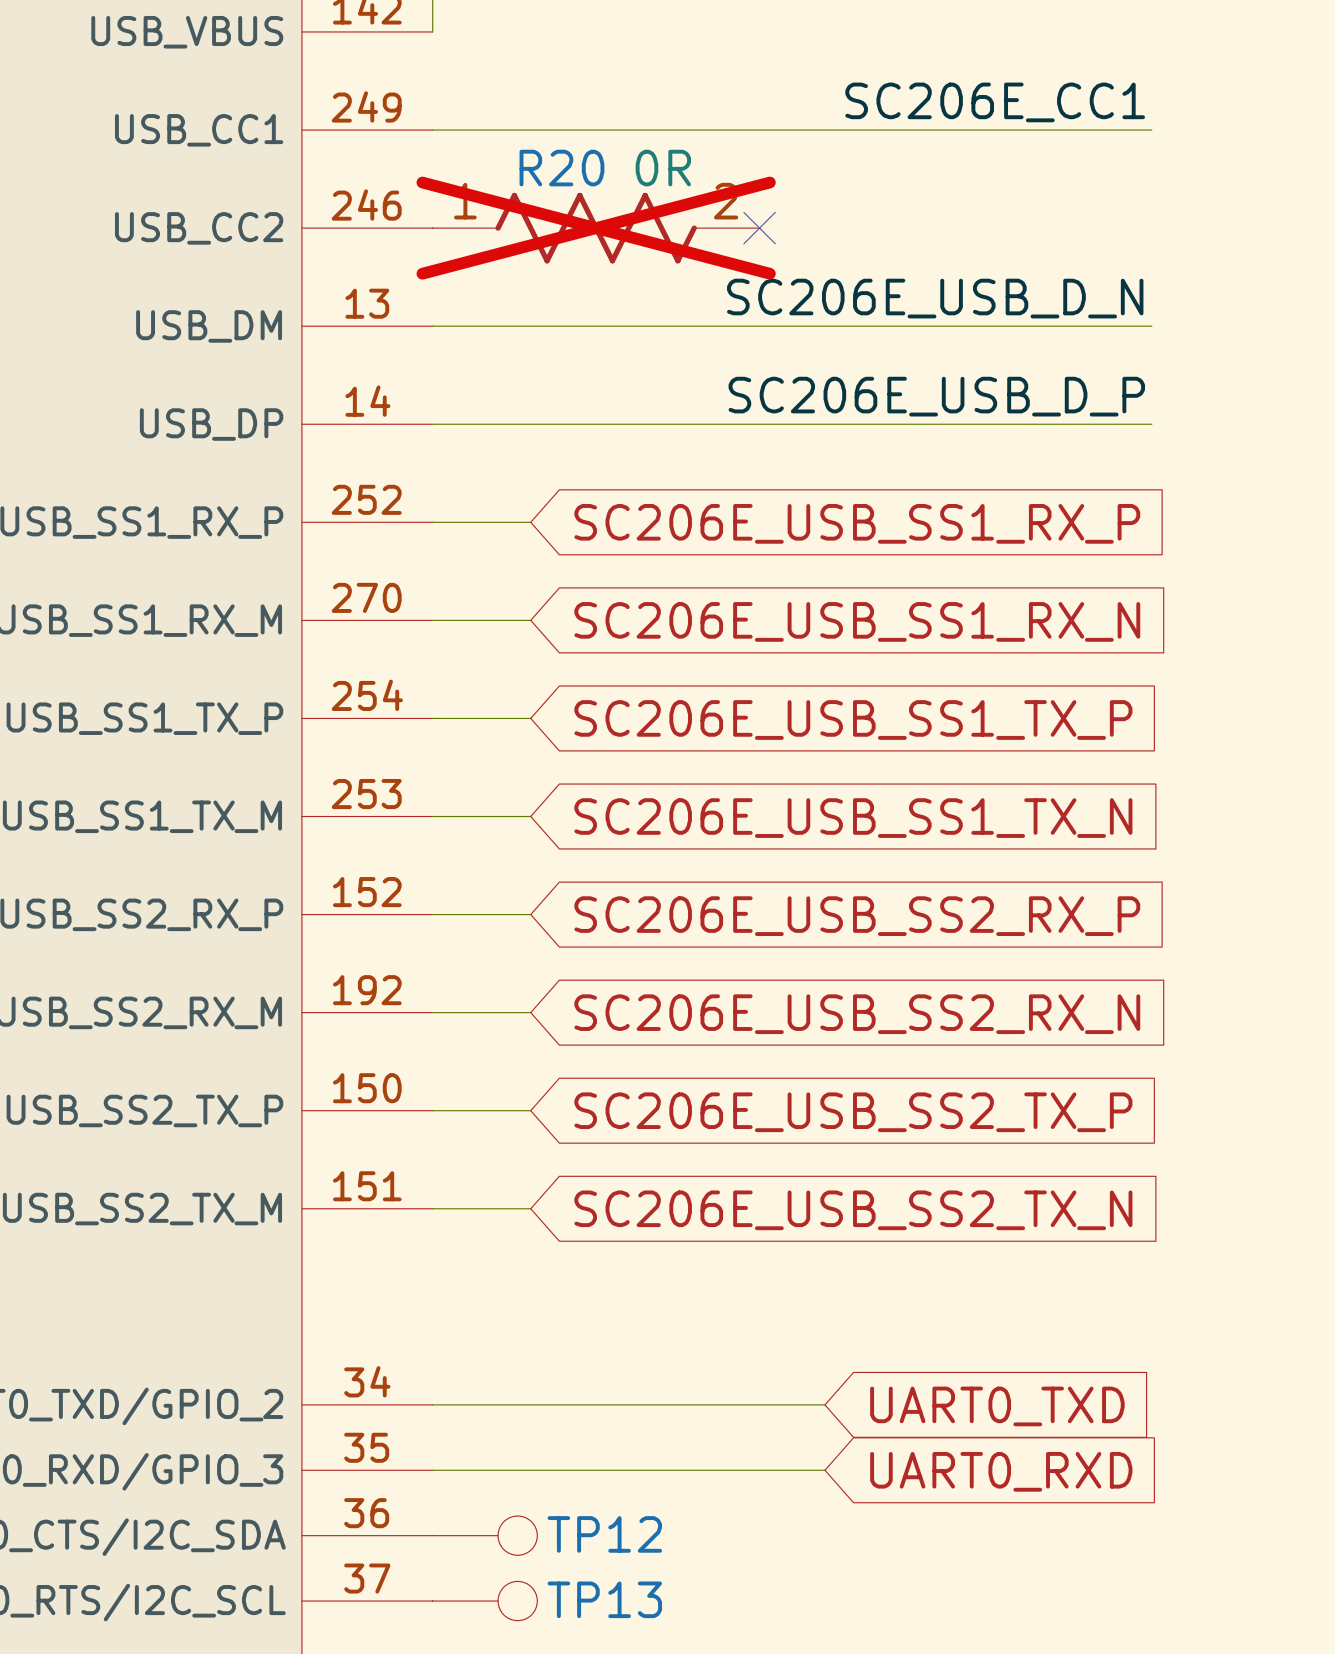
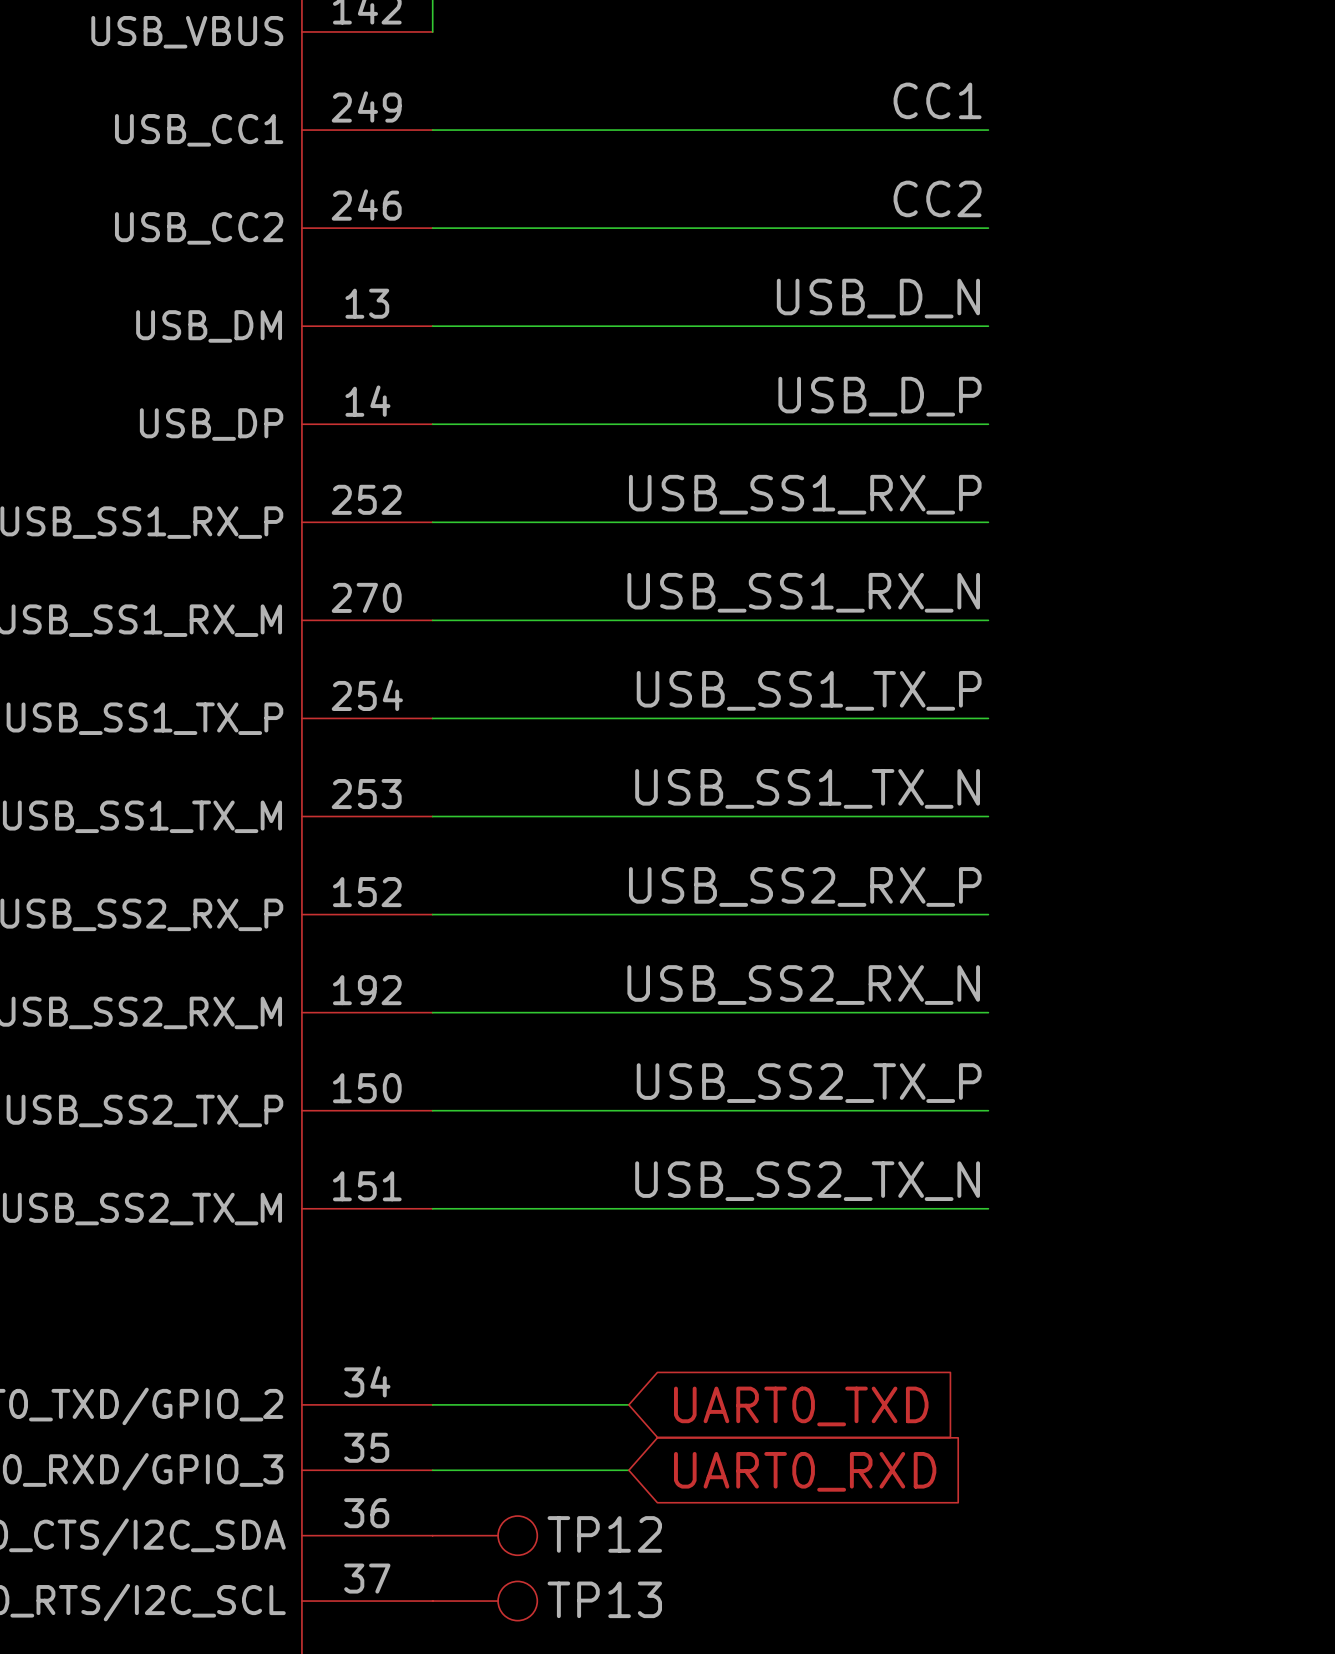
label: none -> CC1 (937, 100)
label: SC206E_CC1 (995, 102) -> none
wire: (988, 130) (1151, 130) -> none
label: none -> CC2 (937, 198)
wire: none -> (432, 228) (988, 228)
R20: 0R (596, 228) -> none
no-connect mark: (759, 228) -> none
label: SC206E_USB_D_N (935, 298) -> USB_D_N (878, 298)
wire: (988, 326) (1151, 326) -> none
label: SC206E_USB_D_P (936, 396) -> USB_D_P (879, 396)
wire: (988, 424) (1151, 424) -> none
label: none -> USB_SS1_RX_P (805, 494)
wire: none -> (530, 522) (988, 522)
global label: SC206E_USB_SS1_RX_P (857, 523) -> none
label: none -> USB_SS1_RX_N (803, 592)
wire: none -> (530, 620) (988, 620)
global label: SC206E_USB_SS1_RX_N (857, 621) -> none
label: none -> USB_SS1_TX_P (809, 690)
wire: none -> (530, 718) (988, 718)
global label: SC206E_USB_SS1_TX_P (853, 720) -> none
label: none -> USB_SS1_TX_N (807, 788)
wire: none -> (530, 816) (988, 816)
global label: SC206E_USB_SS1_TX_N (853, 818) -> none
label: none -> USB_SS2_RX_P (805, 886)
wire: none -> (530, 914) (988, 914)
global label: SC206E_USB_SS2_RX_P (857, 916) -> none
label: none -> USB_SS2_RX_N (803, 985)
wire: none -> (530, 1012) (988, 1012)
global label: SC206E_USB_SS2_RX_N (857, 1014) -> none
label: none -> USB_SS2_TX_P (809, 1083)
wire: none -> (530, 1110) (988, 1110)
global label: SC206E_USB_SS2_TX_P (853, 1112) -> none
label: none -> USB_SS2_TX_N (807, 1181)
wire: none -> (530, 1208) (988, 1208)
global label: SC206E_USB_SS2_TX_N (853, 1210) -> none
wire: (628, 1404) (824, 1404) -> none
global label position: UART0_TXD (997, 1406) -> UART0_TXD (801, 1406)
wire: (628, 1470) (824, 1470) -> none
global label position: UART0_RXD (1001, 1471) -> UART0_RXD (805, 1471)

